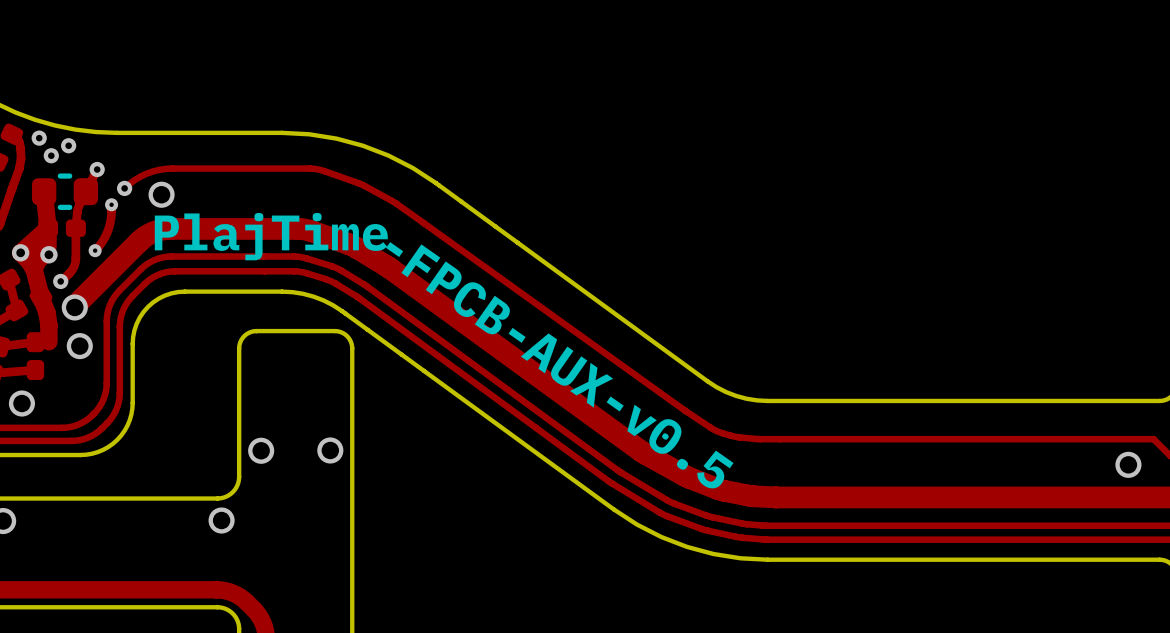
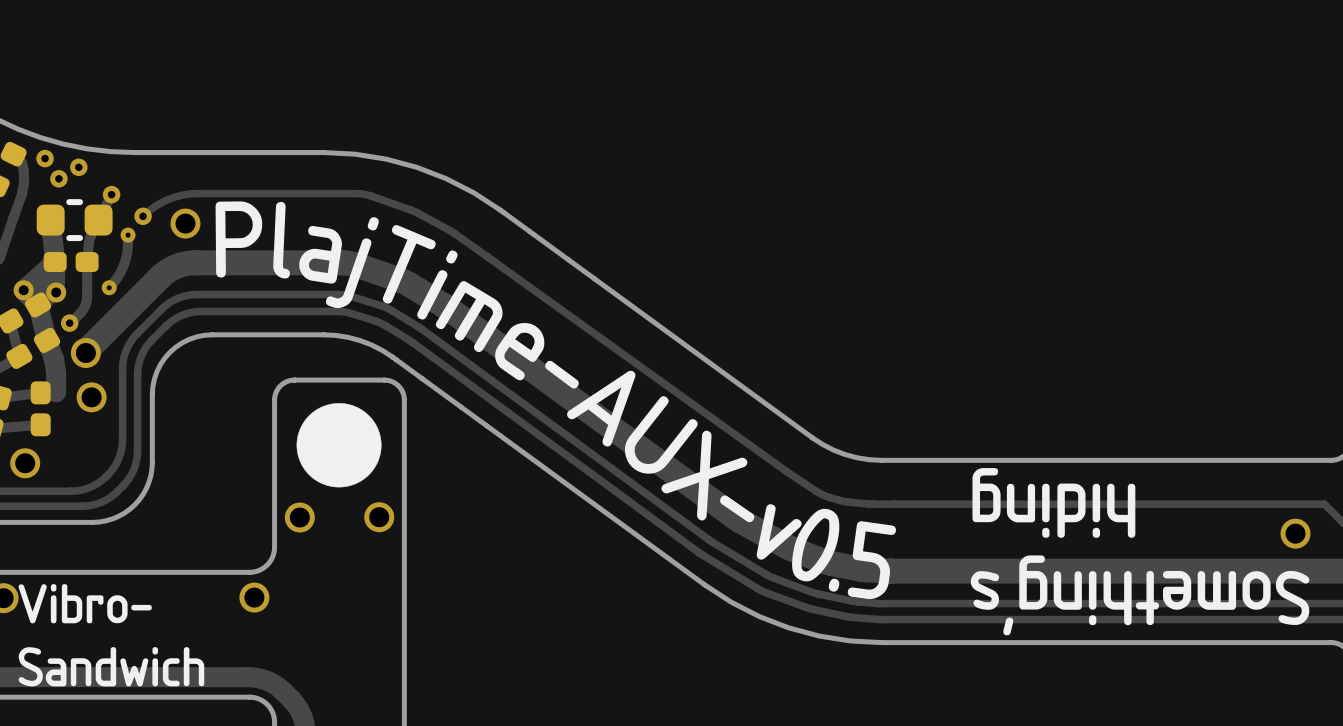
drawing: none -> [215, 201, 896, 600]
text: PlajTime (271, 236) -> none
drawing: none -> [296, 403, 382, 488]
text: -FPCB-AUX-v0.5 (559, 365) -> none
drawing: none -> [970, 468, 1310, 636]
drawing: none -> [18, 584, 205, 687]

